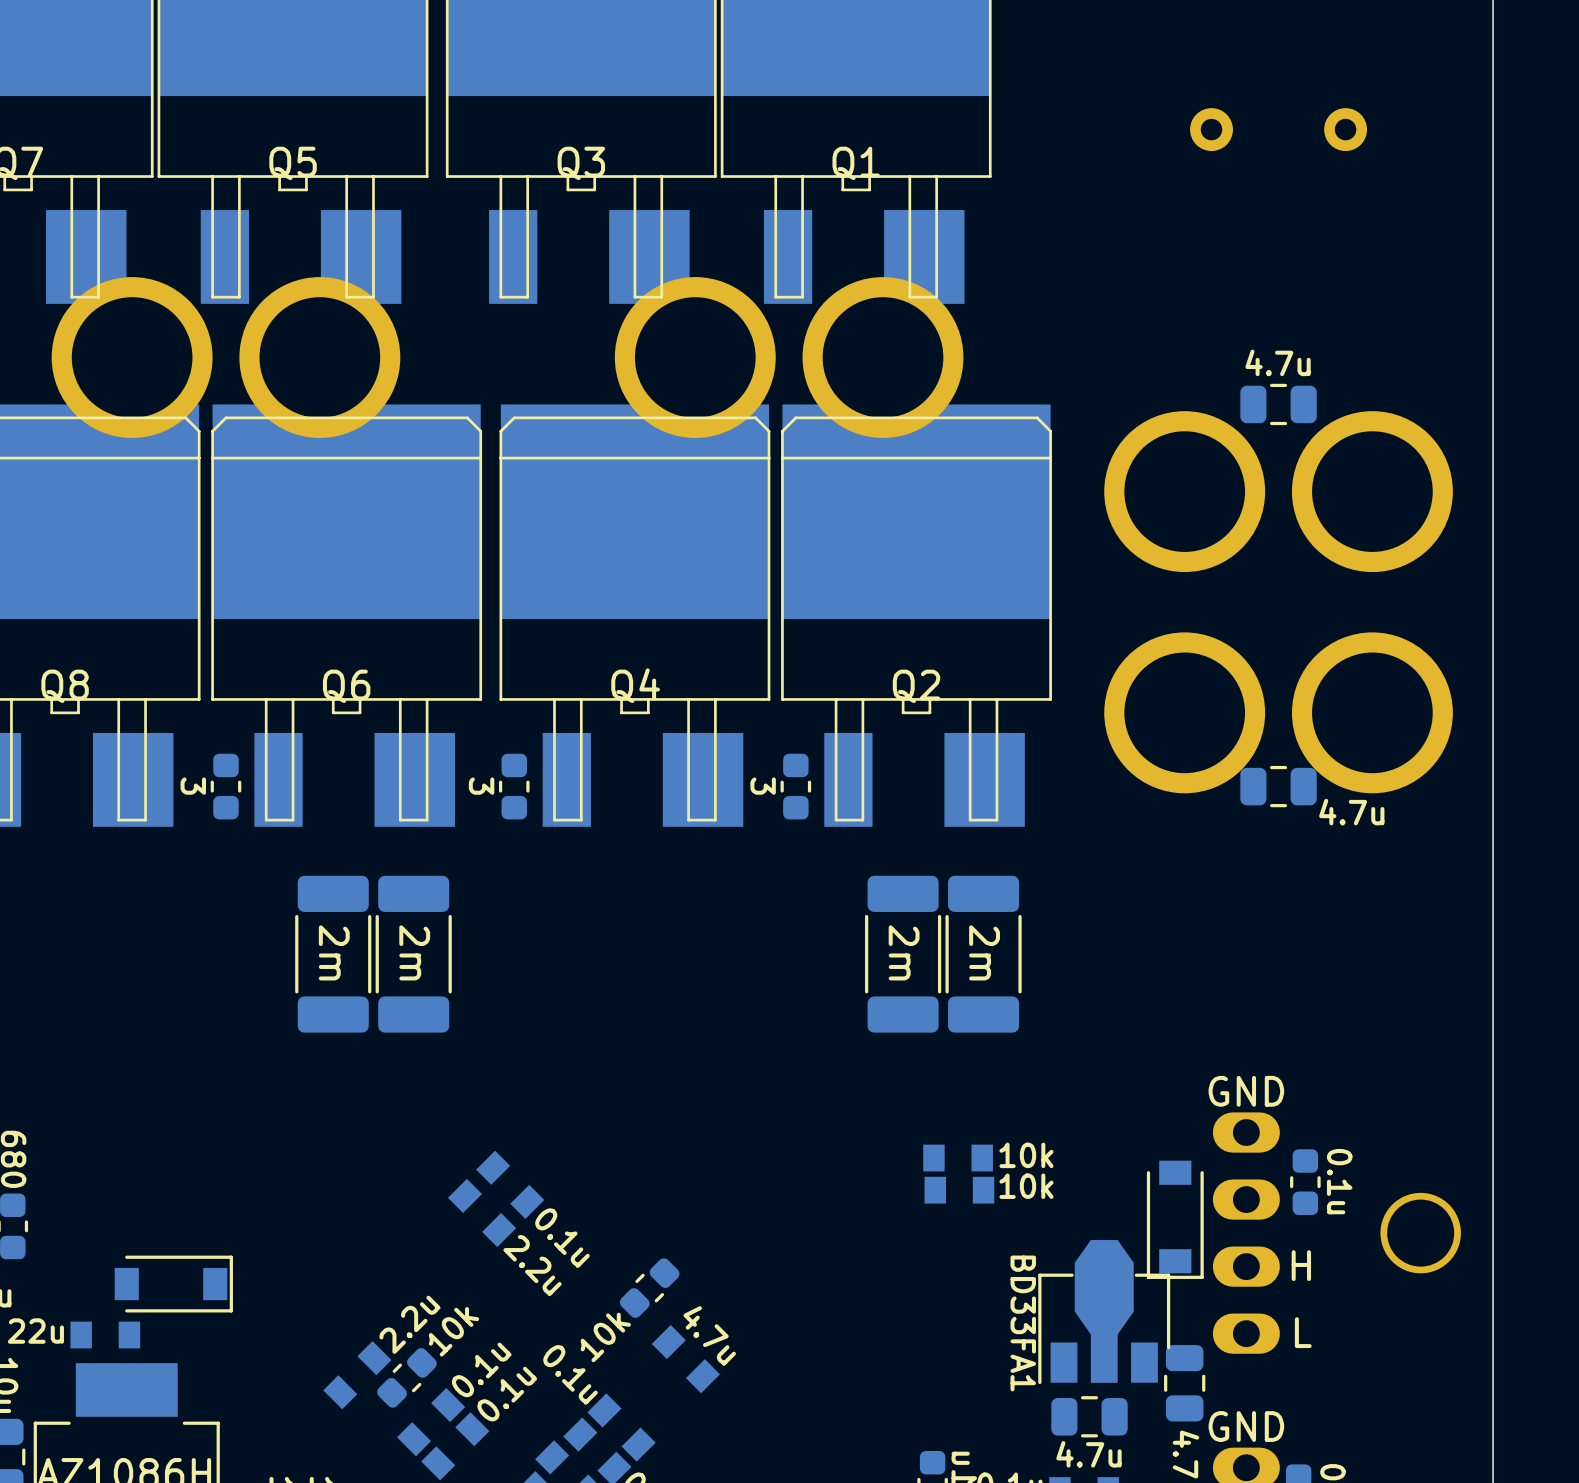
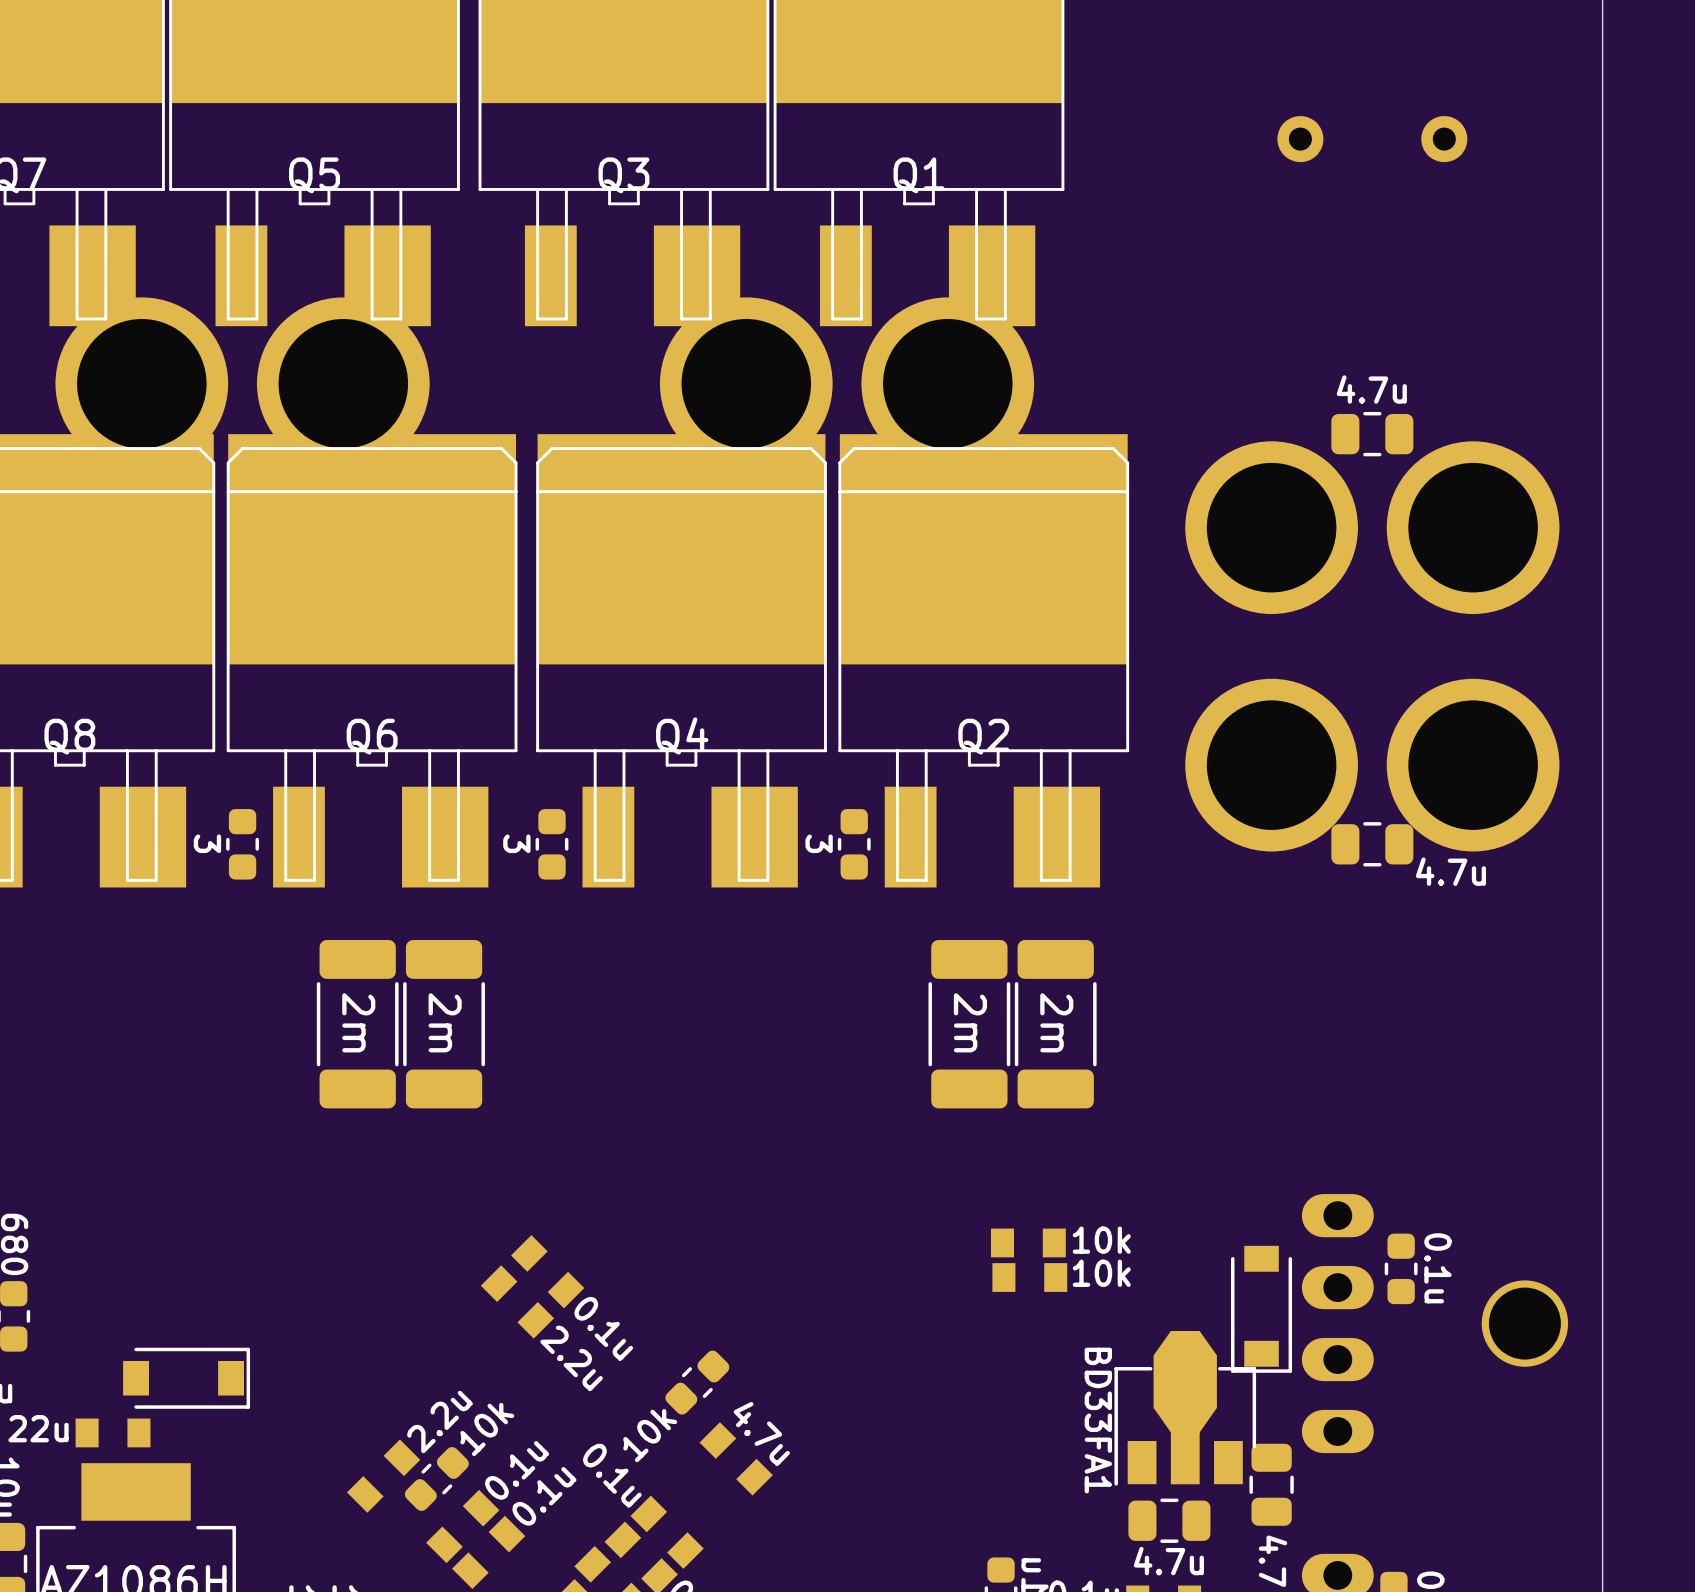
text: GND (1246, 1091) -> none
text: H (1301, 1265) -> none
text: L (1303, 1332) -> none
text: GND (1246, 1426) -> none

